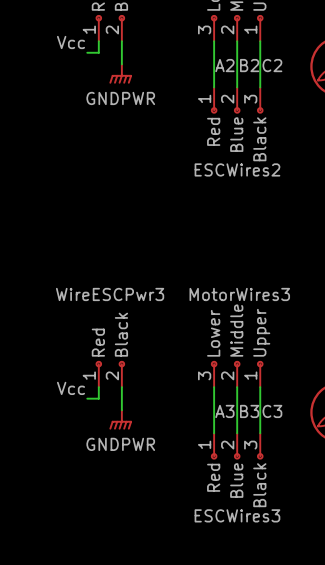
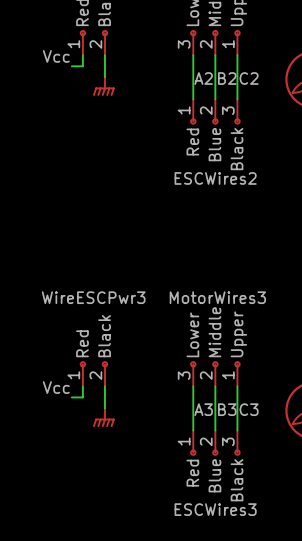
power symbol text: GNDPWR (120, 98) -> none
power symbol text: GNDPWR (120, 444) -> none

